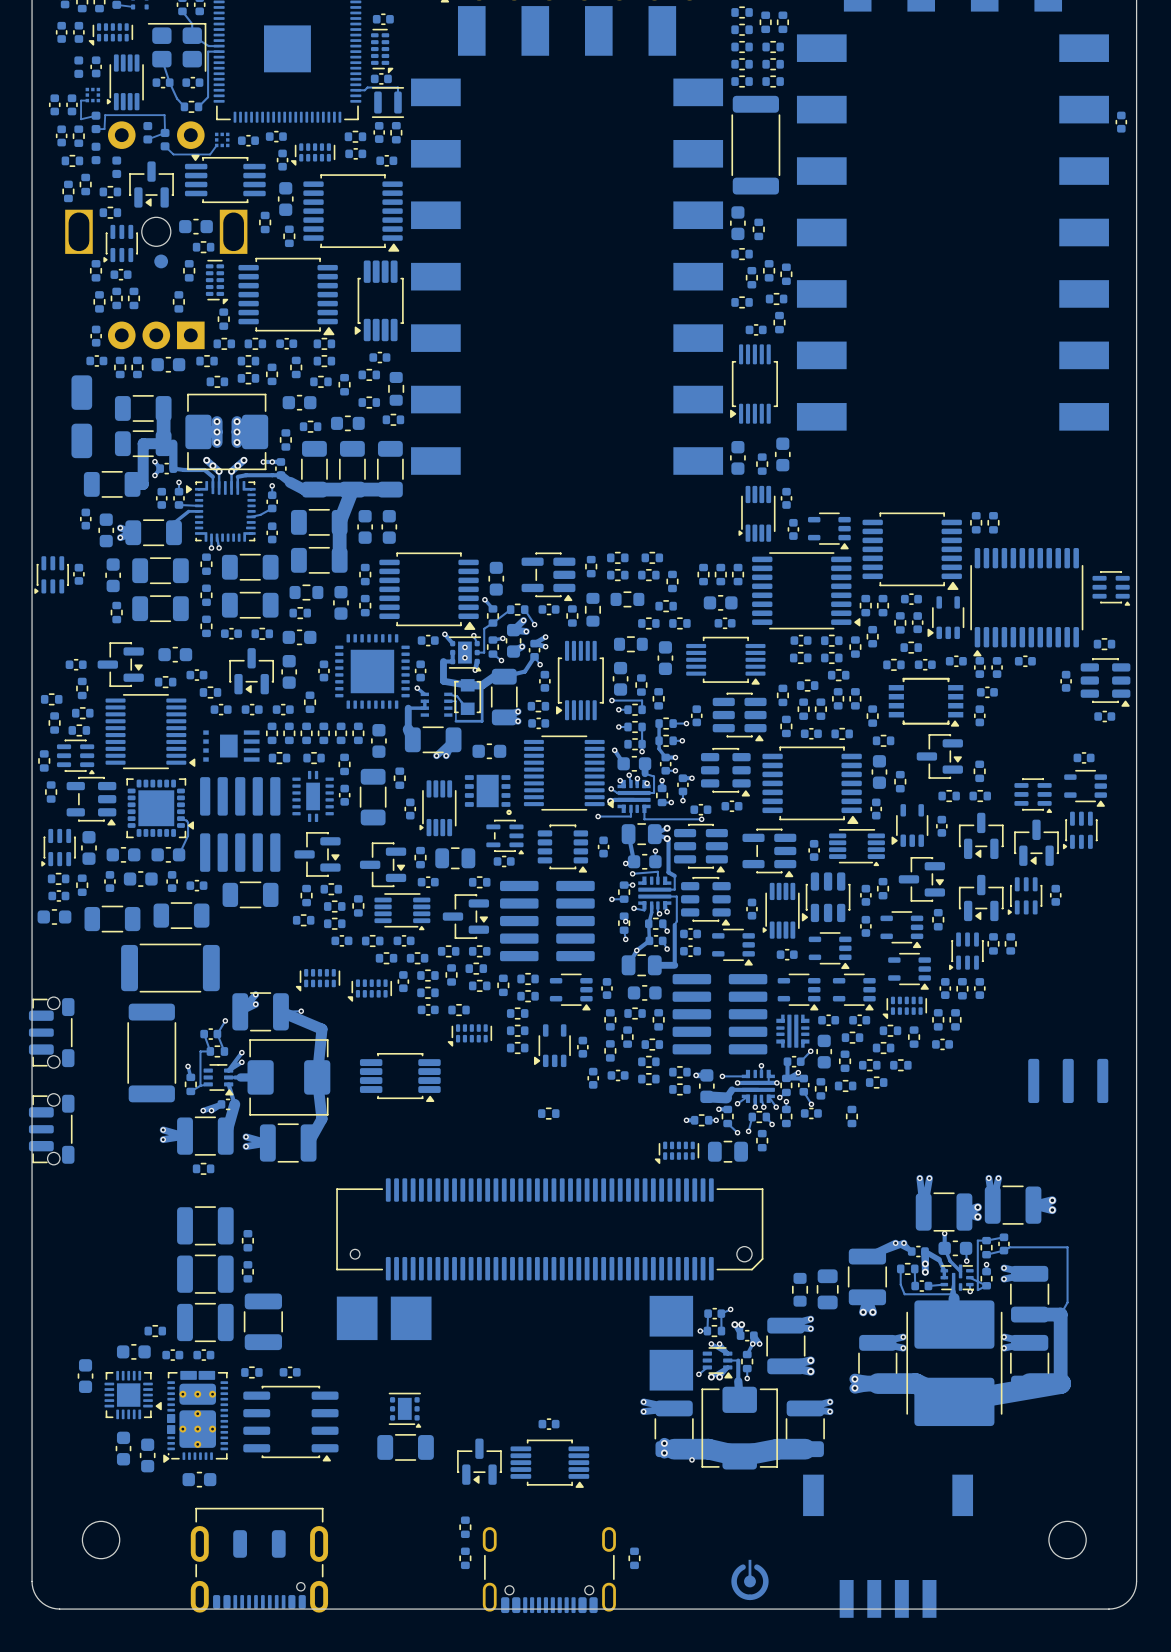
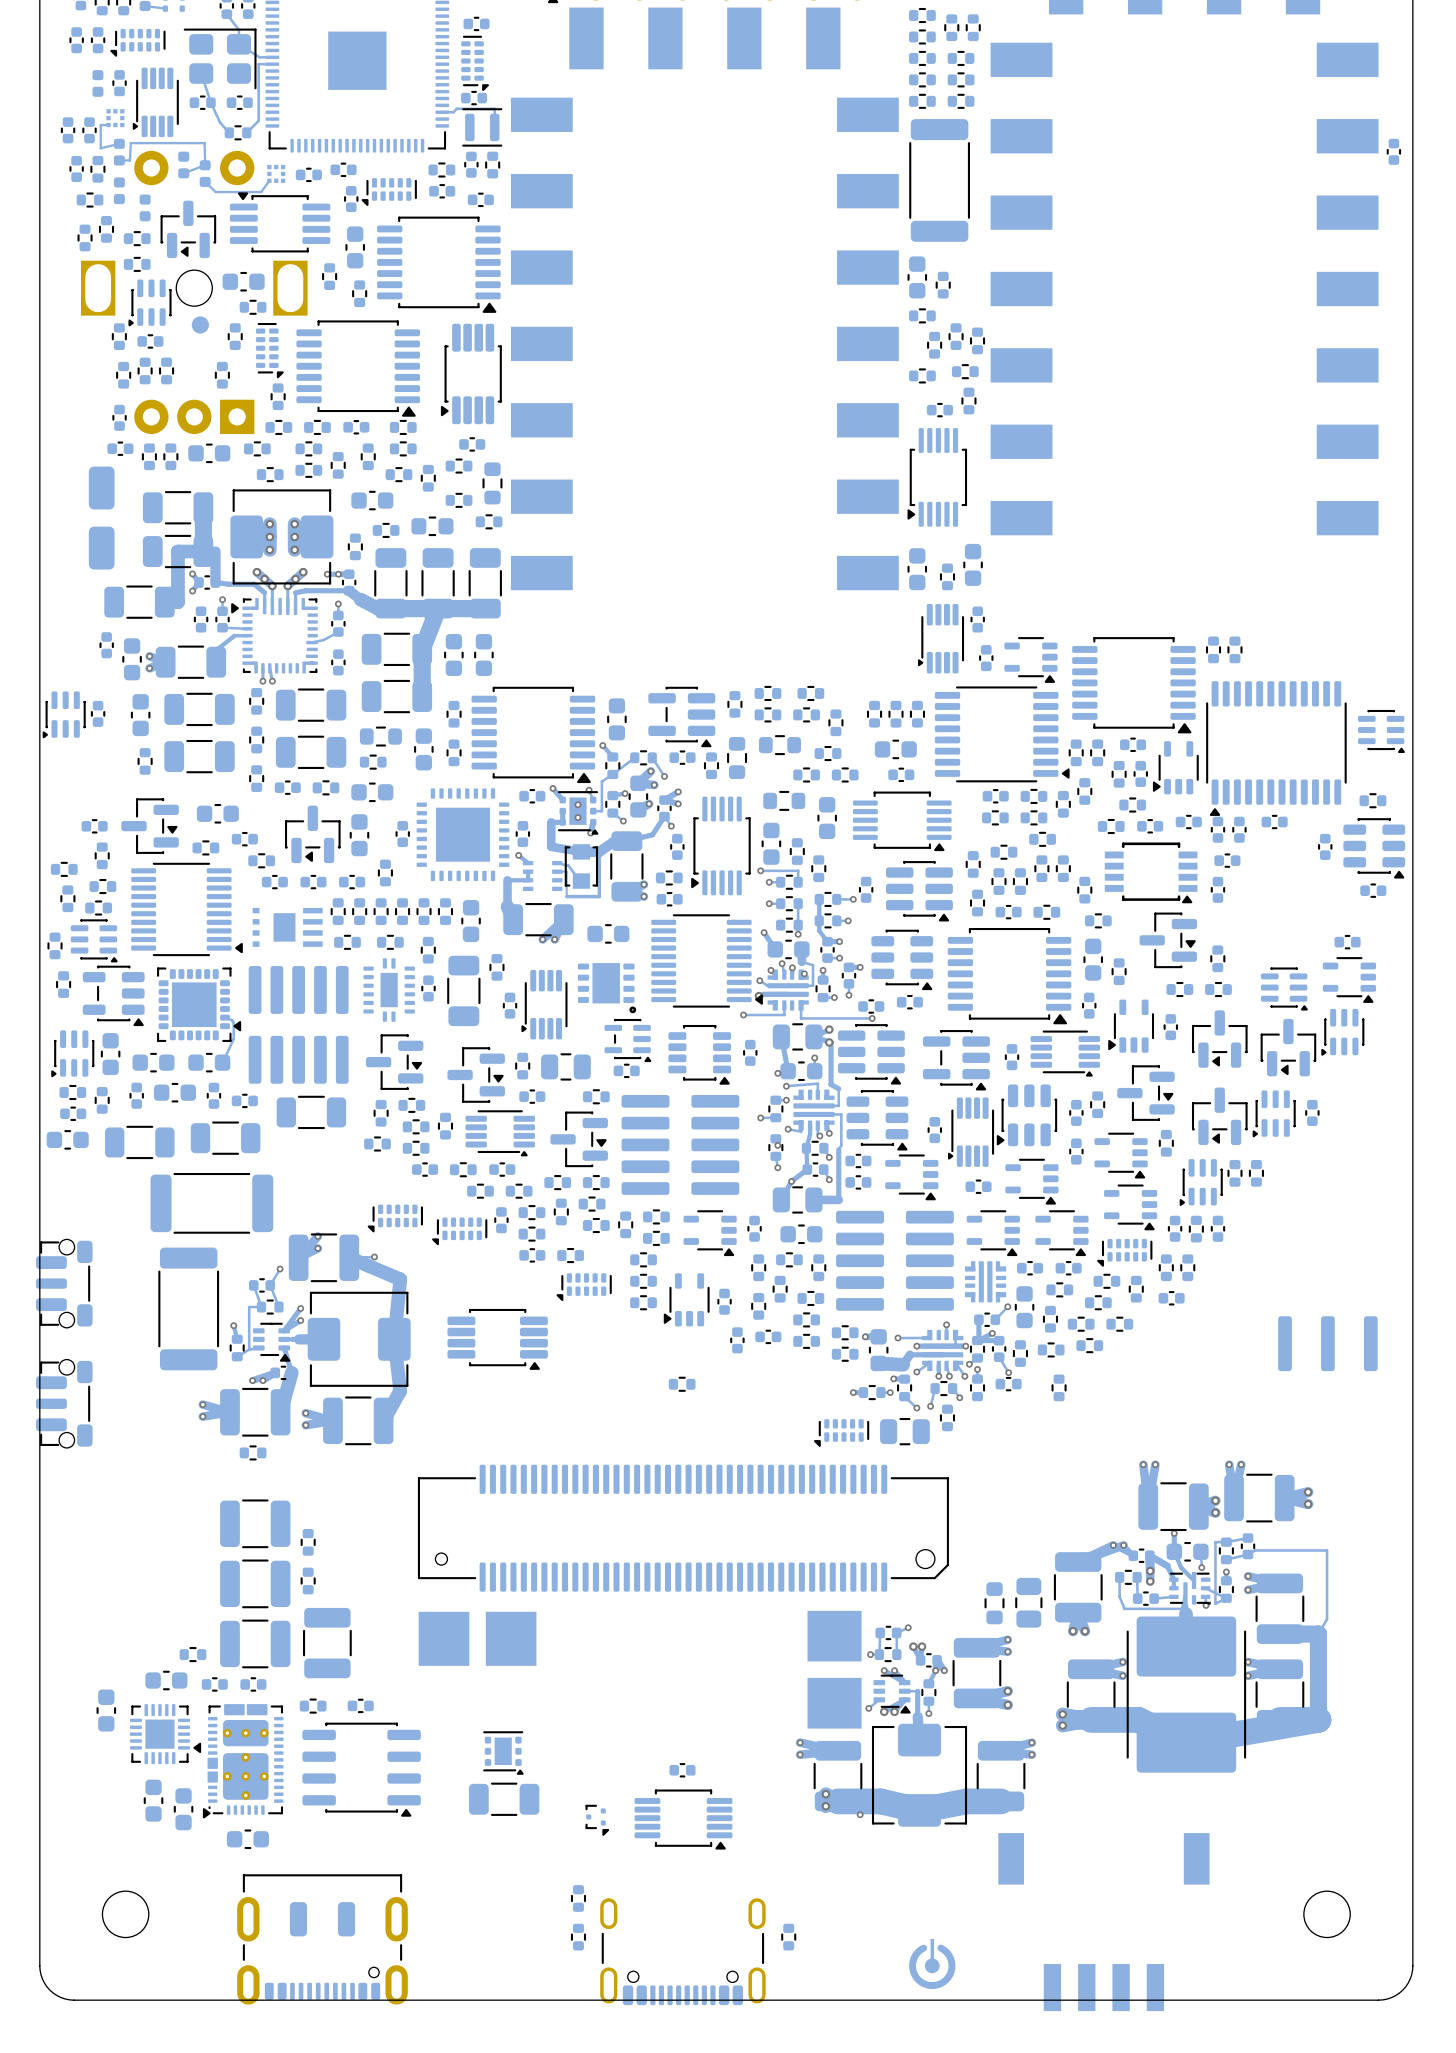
part footprint: [457, 1438, 502, 1485] -> [585, 1804, 610, 1836]

